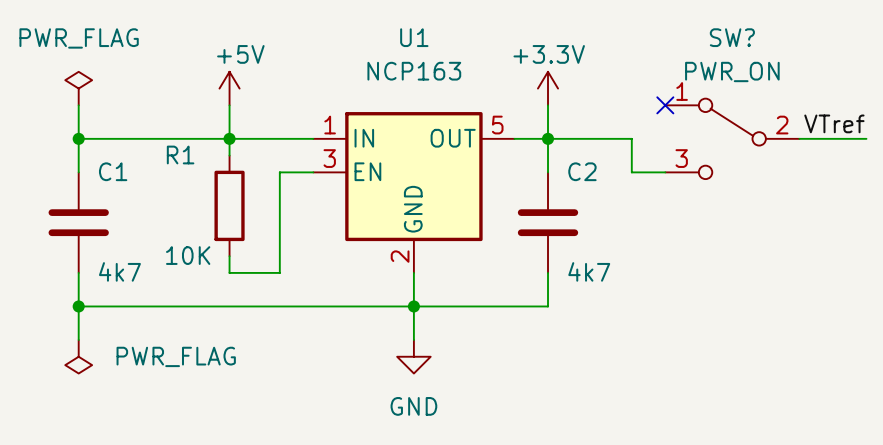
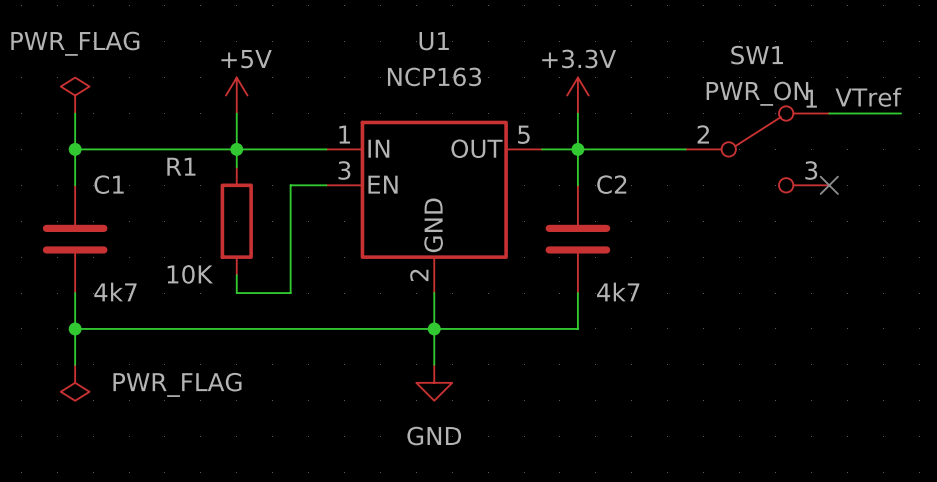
no-connect mark: (665, 105) -> none
label position: VTref (834, 123) -> VTref (868, 97)
wire: (631, 138) (631, 172) (665, 172) -> (667, 149) (685, 149)
SW1: none -> PWR_ON (757, 149)
SW?: PWR_ON (732, 138) -> none
wire: (799, 138) (866, 138) -> (829, 113) (901, 113)
no-connect mark: none -> (829, 185)

